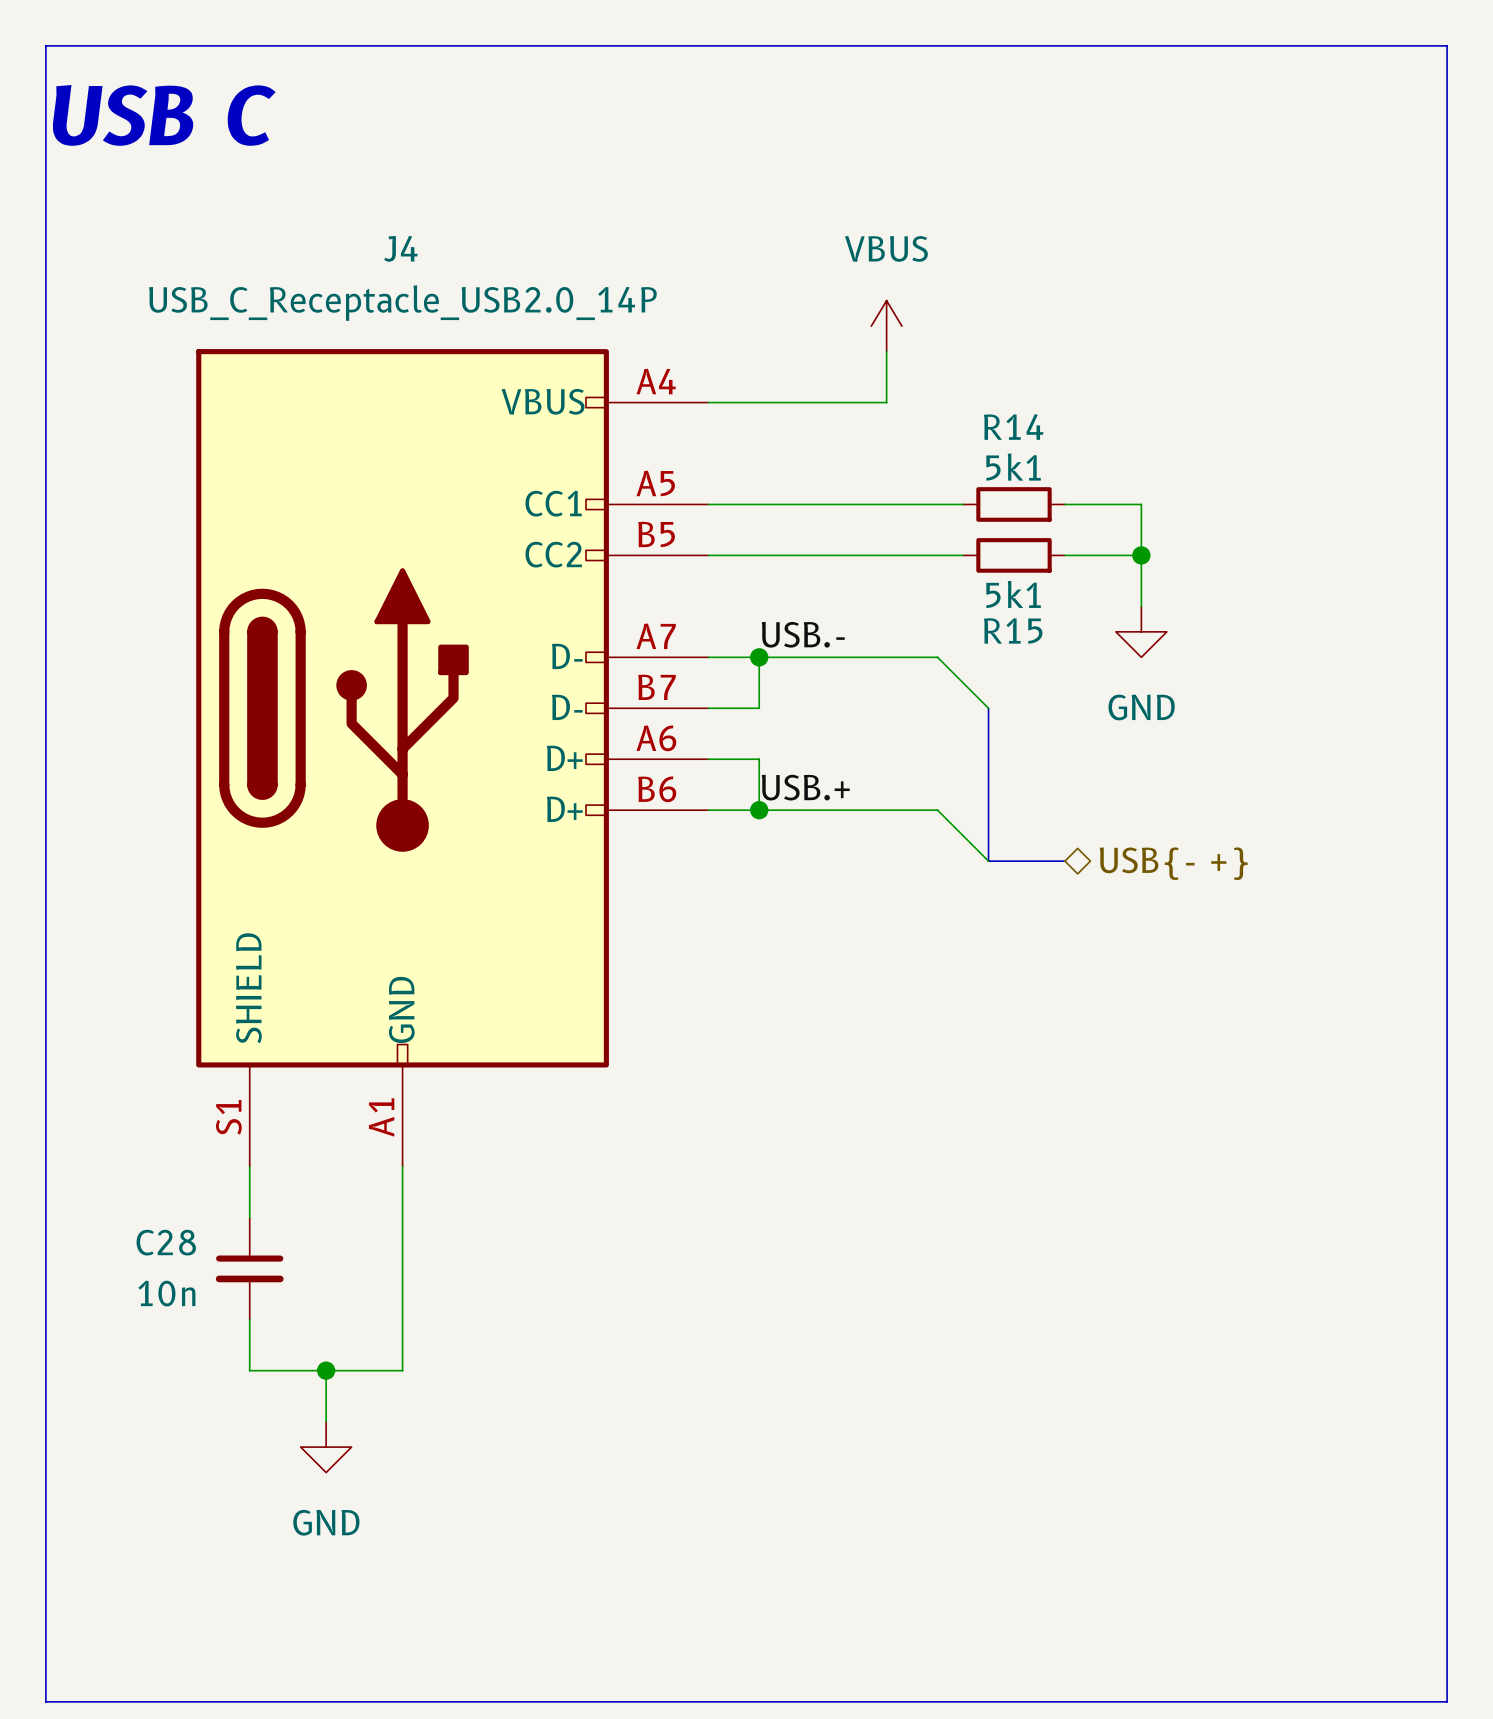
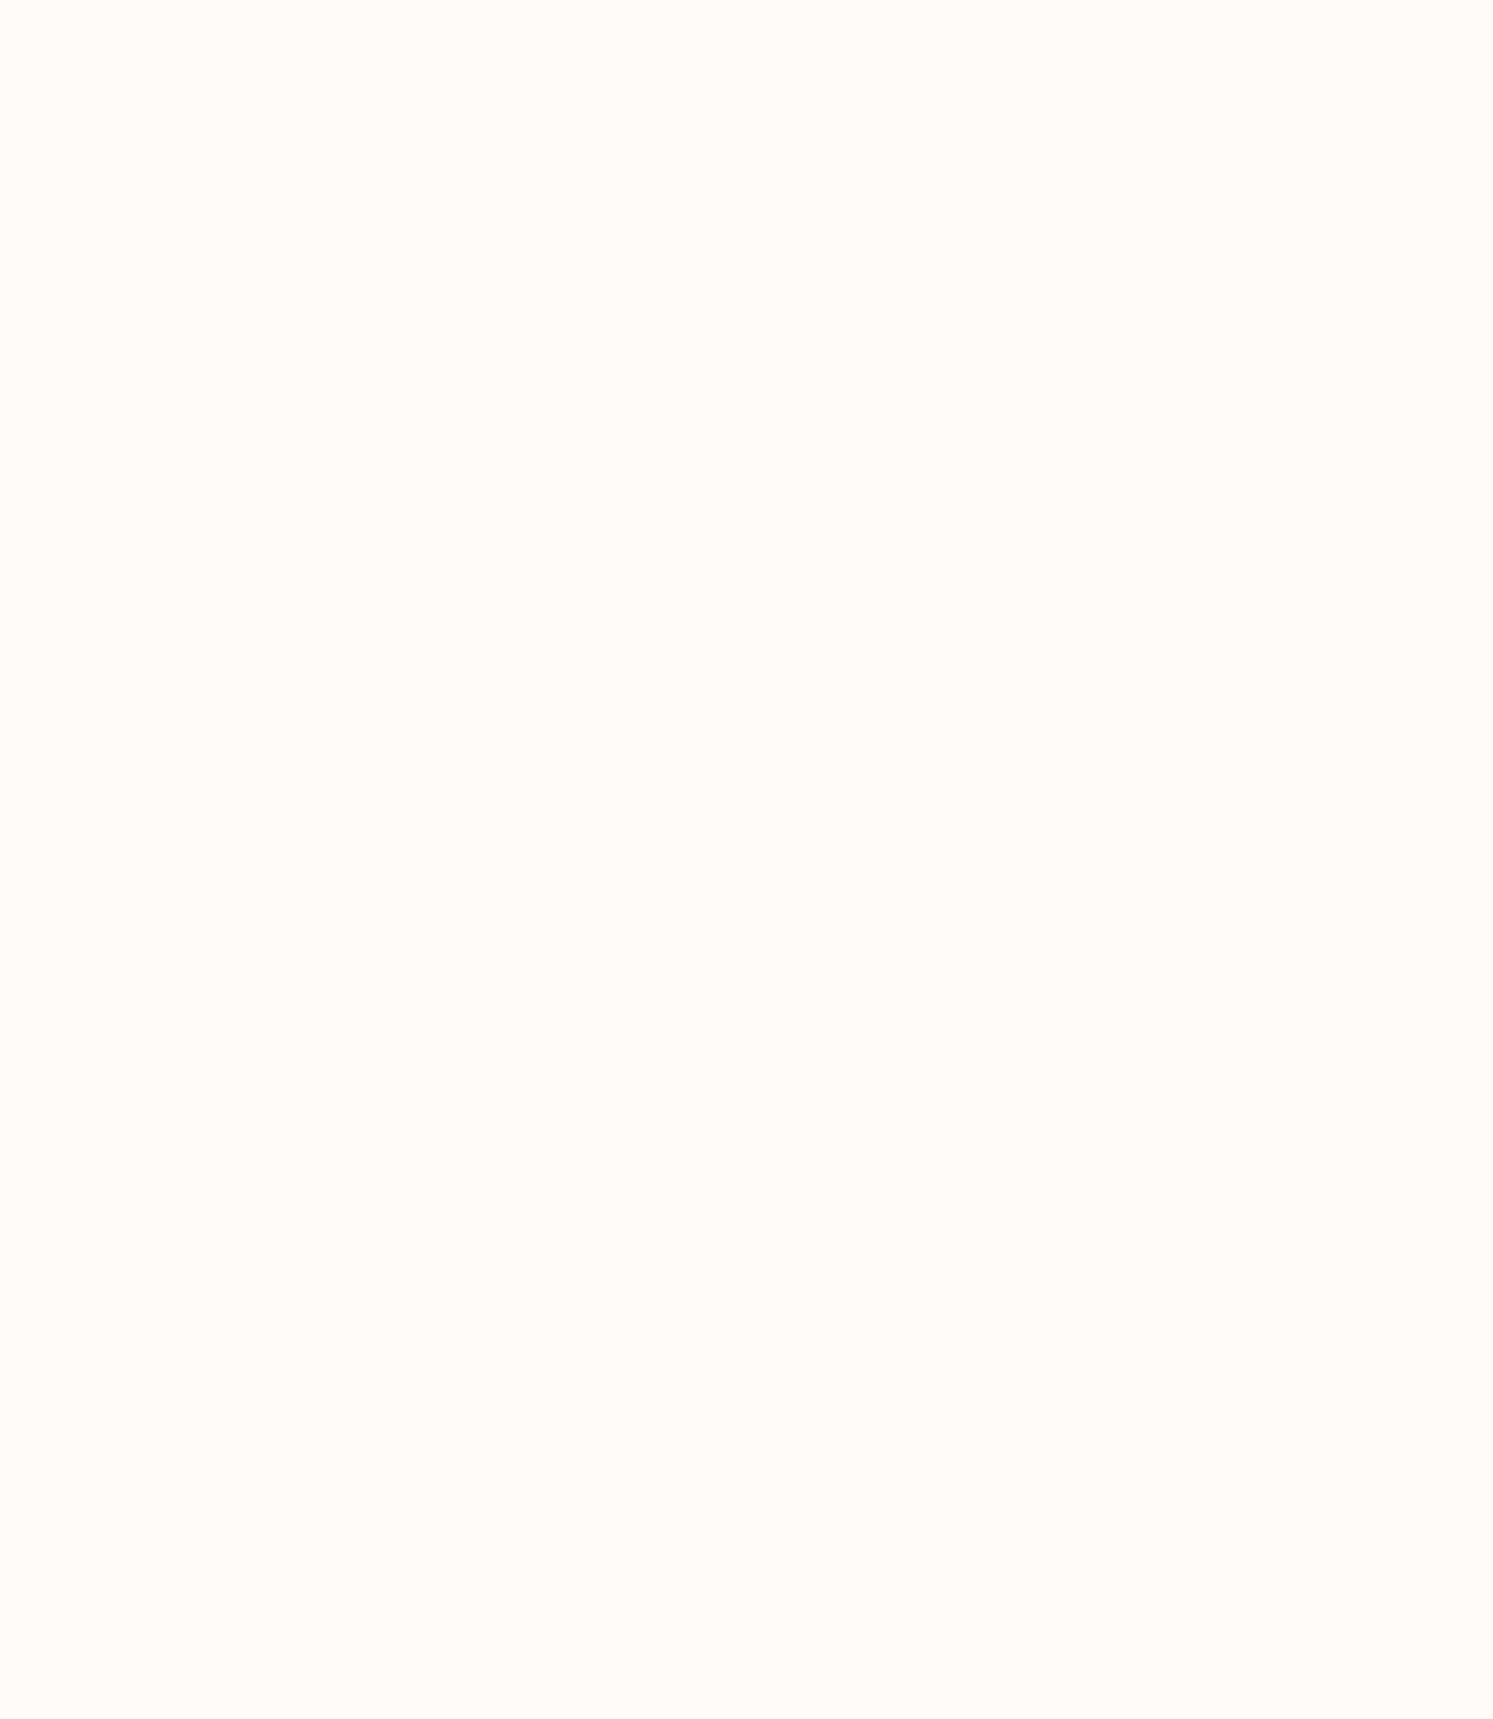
line: (45, 45) (1447, 45) (1447, 1701) (45, 1701) (45, 45) -> none
text: USB C (164, 115) -> none
power symbol: VBUS (886, 326) -> none
wire: (886, 351) (886, 402) (708, 402) -> none
wire: (708, 504) (963, 504) -> none
R14: 5k1 (1013, 504) -> none
wire: (1064, 504) (1141, 504) (1141, 606) -> none
wire: (708, 555) (963, 555) -> none
R15: 5k1 (1013, 555) -> none
wire: (1064, 555) (1141, 555) -> none
junction: (1141, 555) -> none
power symbol: GND (1141, 631) -> none
label: USB.- (803, 634) -> none
wire: (708, 657) (937, 657) (988, 708) -> none
wire: (759, 657) (759, 708) (708, 708) -> none
junction: (759, 657) -> none
bus: (988, 708) (988, 861) (1064, 861) -> none
J4: USB_C_Receptacle_USB2.0_14P (452, 757) -> none
wire: (708, 759) (759, 759) (759, 810) -> none
label: USB.+ (805, 787) -> none
wire: (708, 810) (937, 810) (988, 861) -> none
junction: (759, 810) -> none
hierarchical label: USB{- +} (1173, 863) -> none
wire: (249, 1166) (249, 1217) -> none
wire: (402, 1166) (402, 1370) (249, 1370) (249, 1319) -> none
C28: 10n (249, 1268) -> none
wire: (326, 1370) (326, 1421) -> none
junction: (326, 1370) -> none
power symbol: GND (326, 1447) -> none

